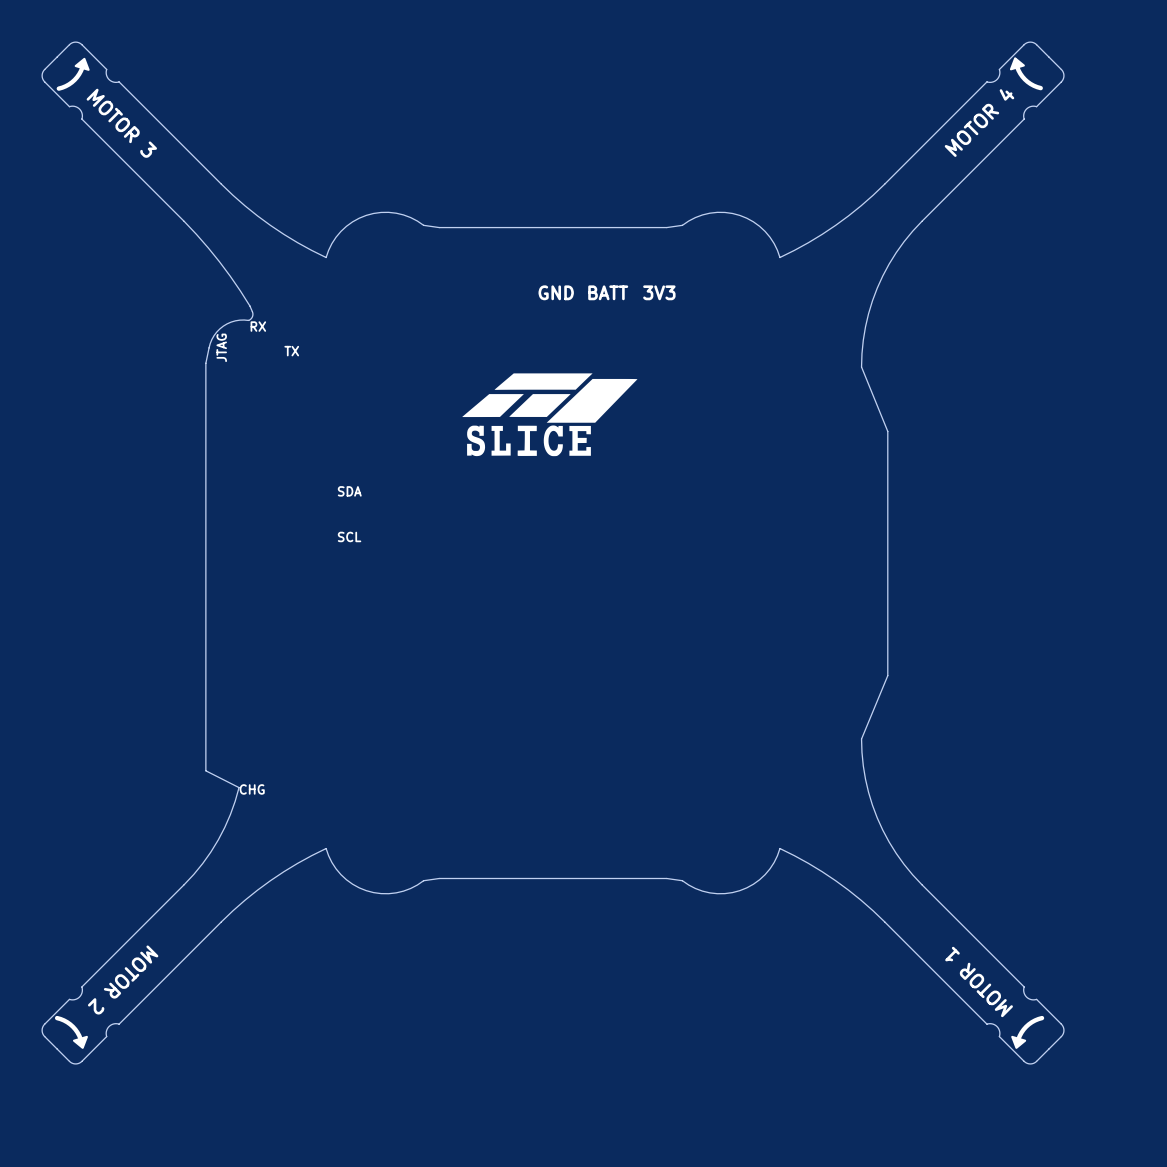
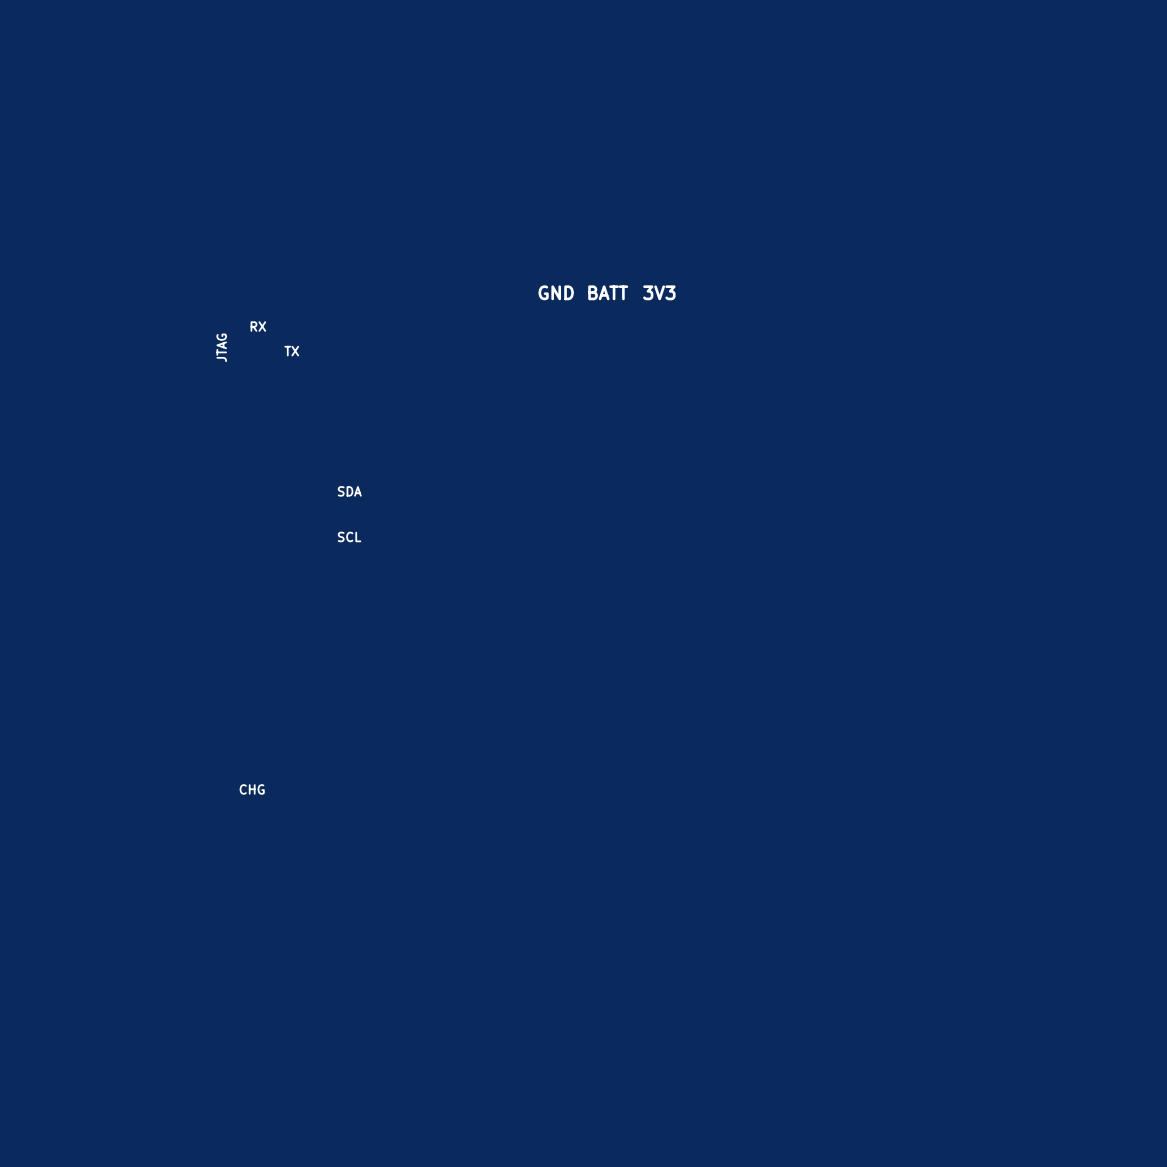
drawing: [41, 41, 1065, 1065] -> none
line: (1016, 63) (1024, 79) (1040, 88) -> none
line: (83, 64) (74, 79) (58, 88) -> none
text: MOTOR 3 (121, 123) -> none
text: MOTOR 4 (979, 123) -> none
text: MOTOR 2 (123, 979) -> none
text: MOTOR 1 (979, 981) -> none
line: (57, 1018) (72, 1026) (81, 1042) -> none
line: (1042, 1018) (1026, 1026) (1017, 1042) -> none

